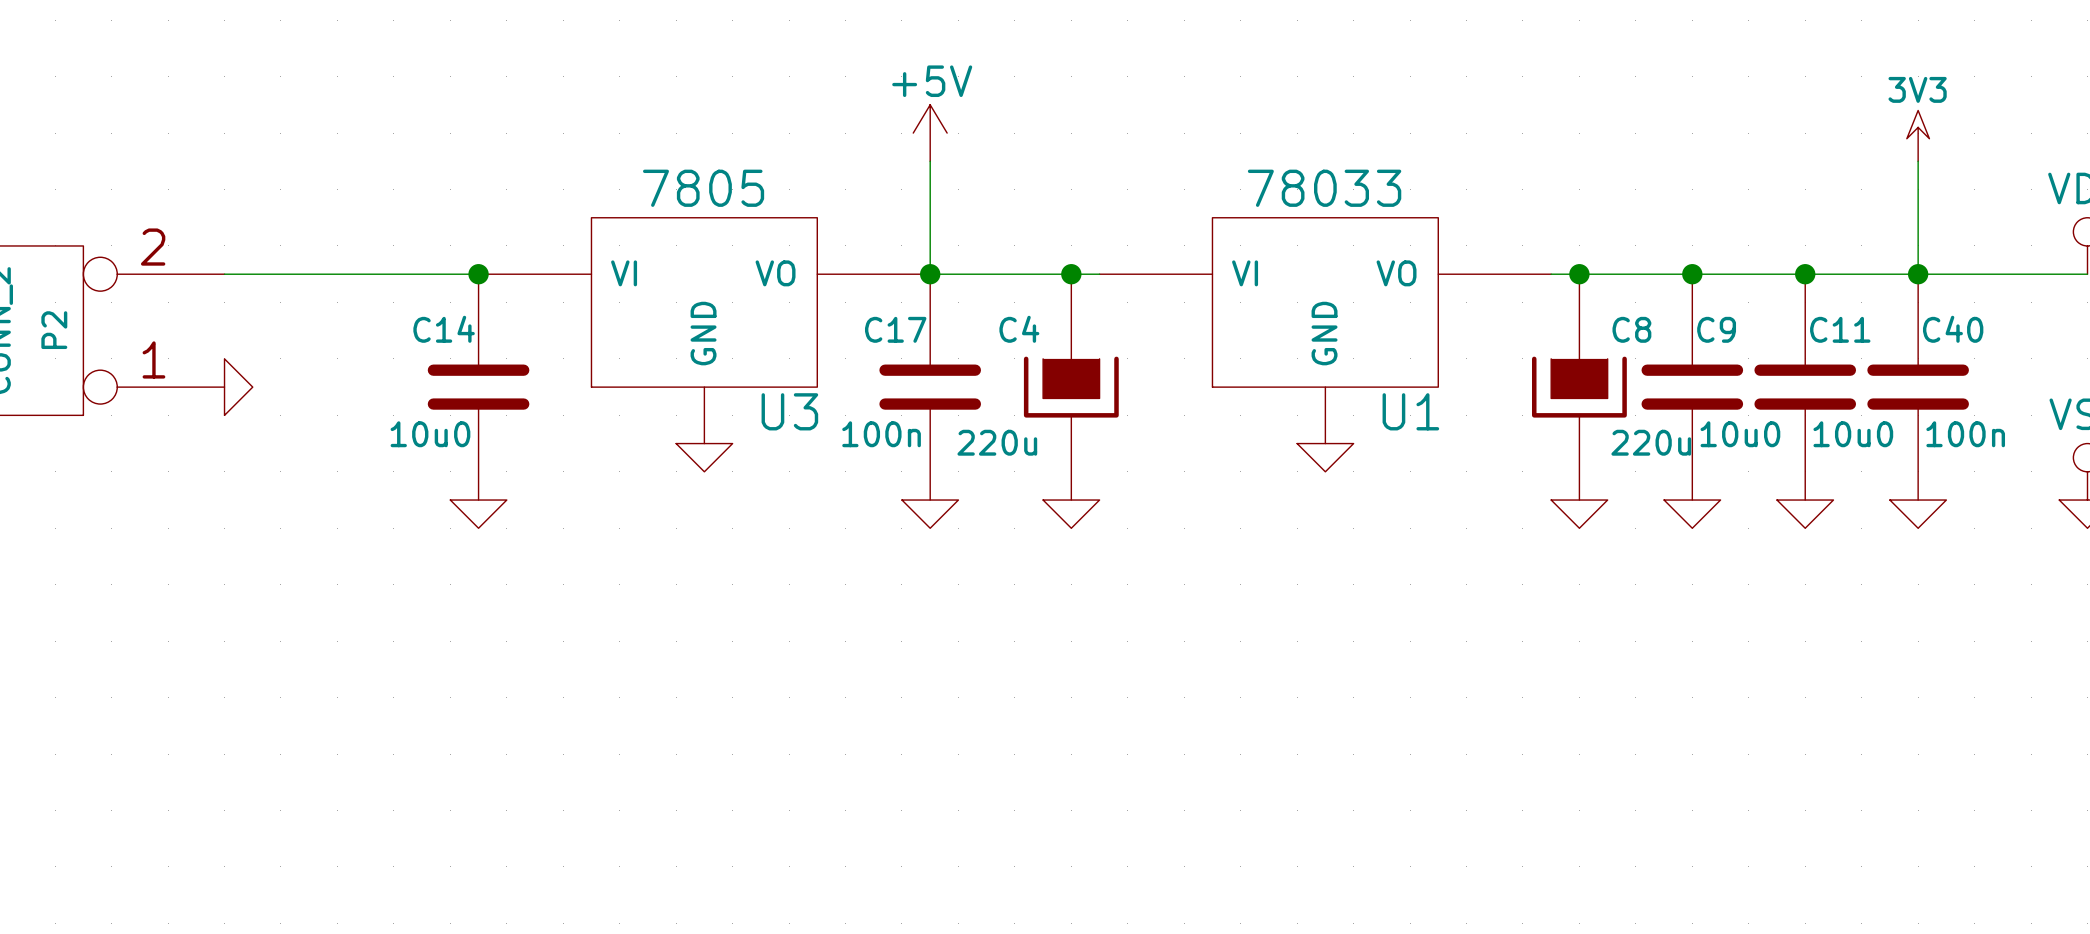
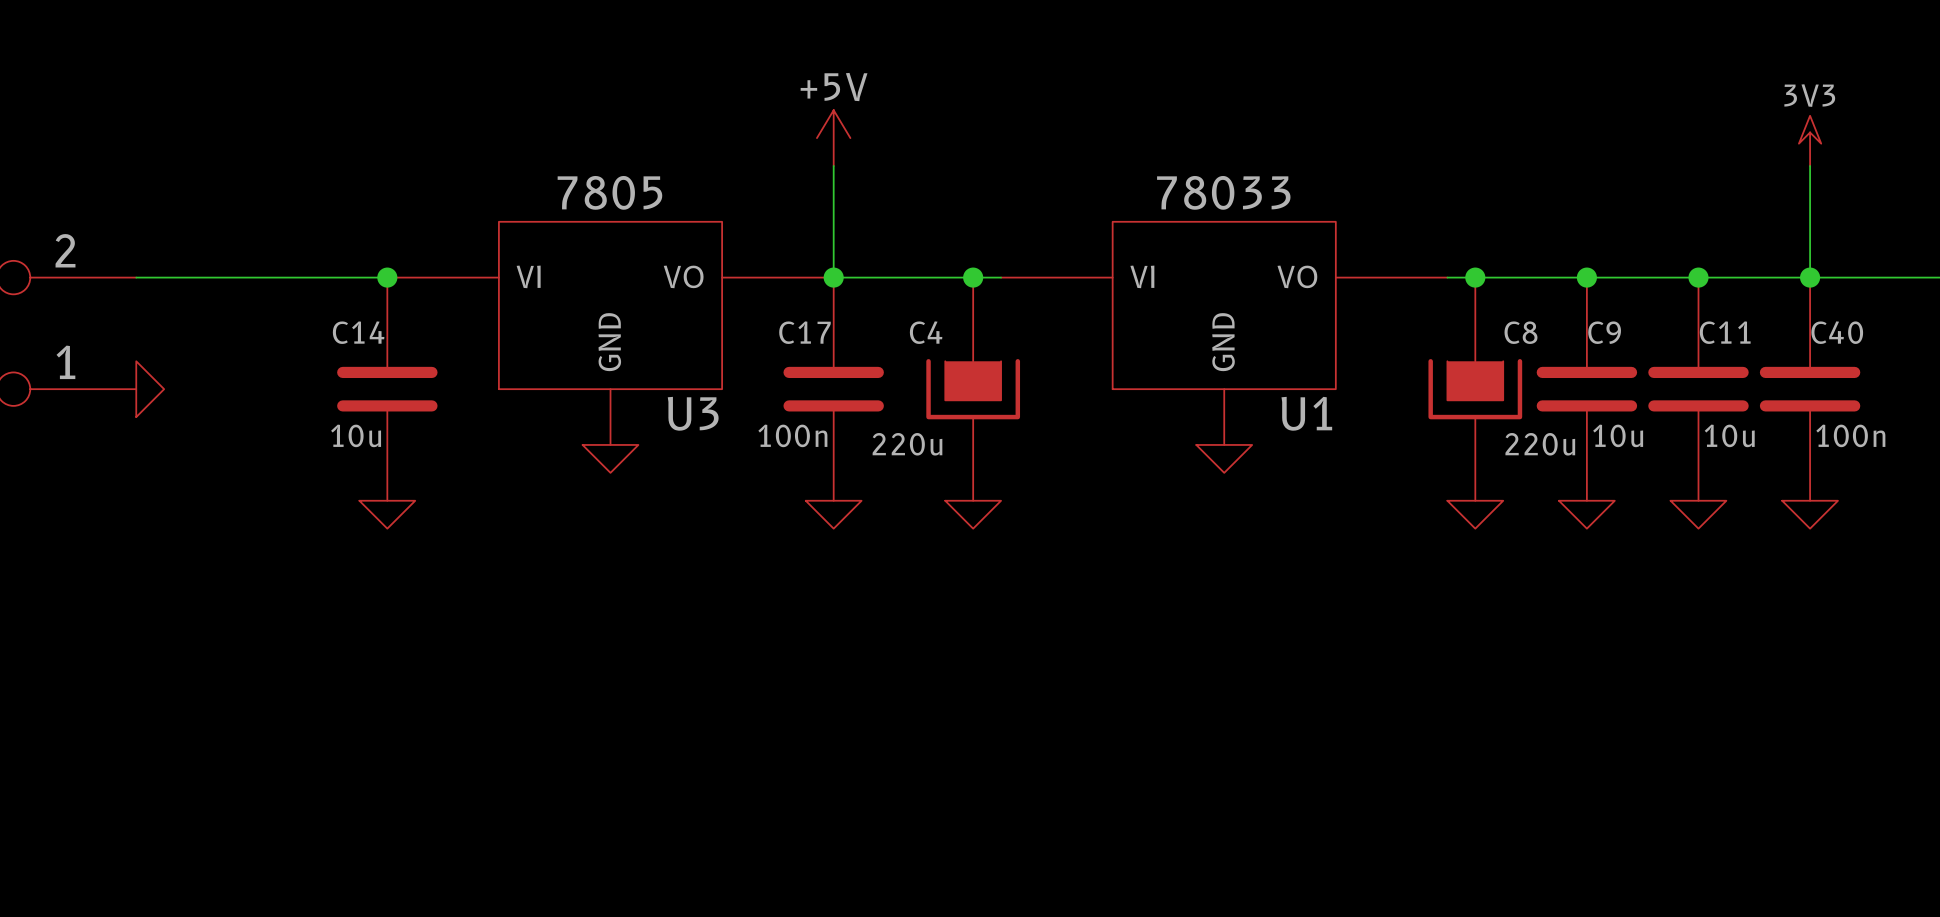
C14 value: 10u0 (430, 434) -> 10u (356, 435)
C9 value: 10u0 (1740, 434) -> 10u (1618, 435)
C11 value: 10u0 (1853, 434) -> 10u (1729, 435)

